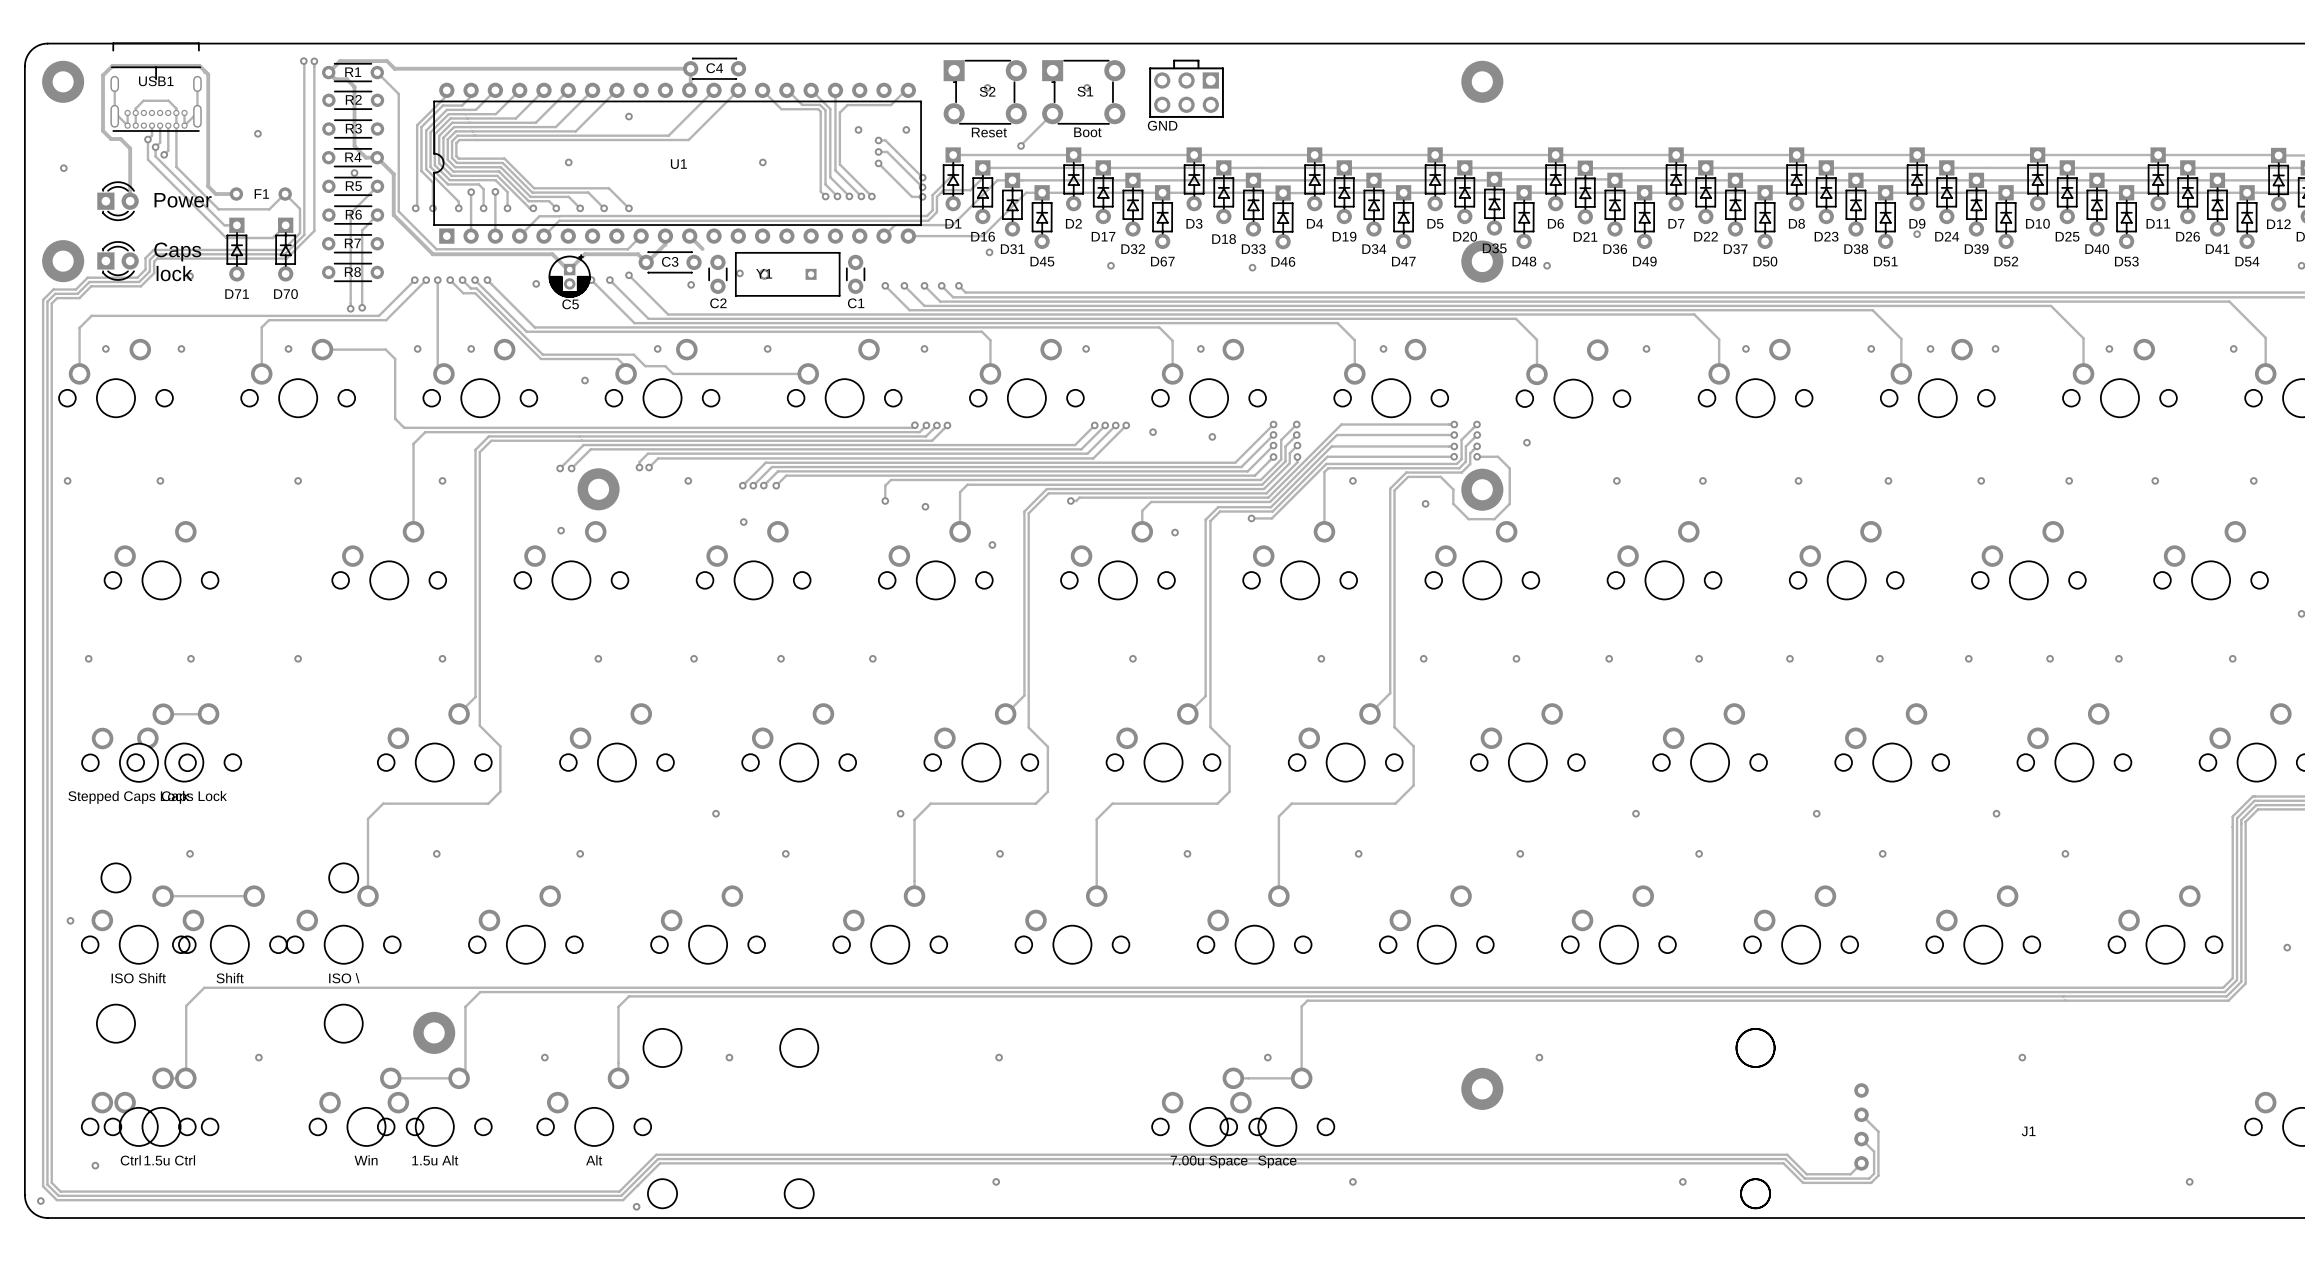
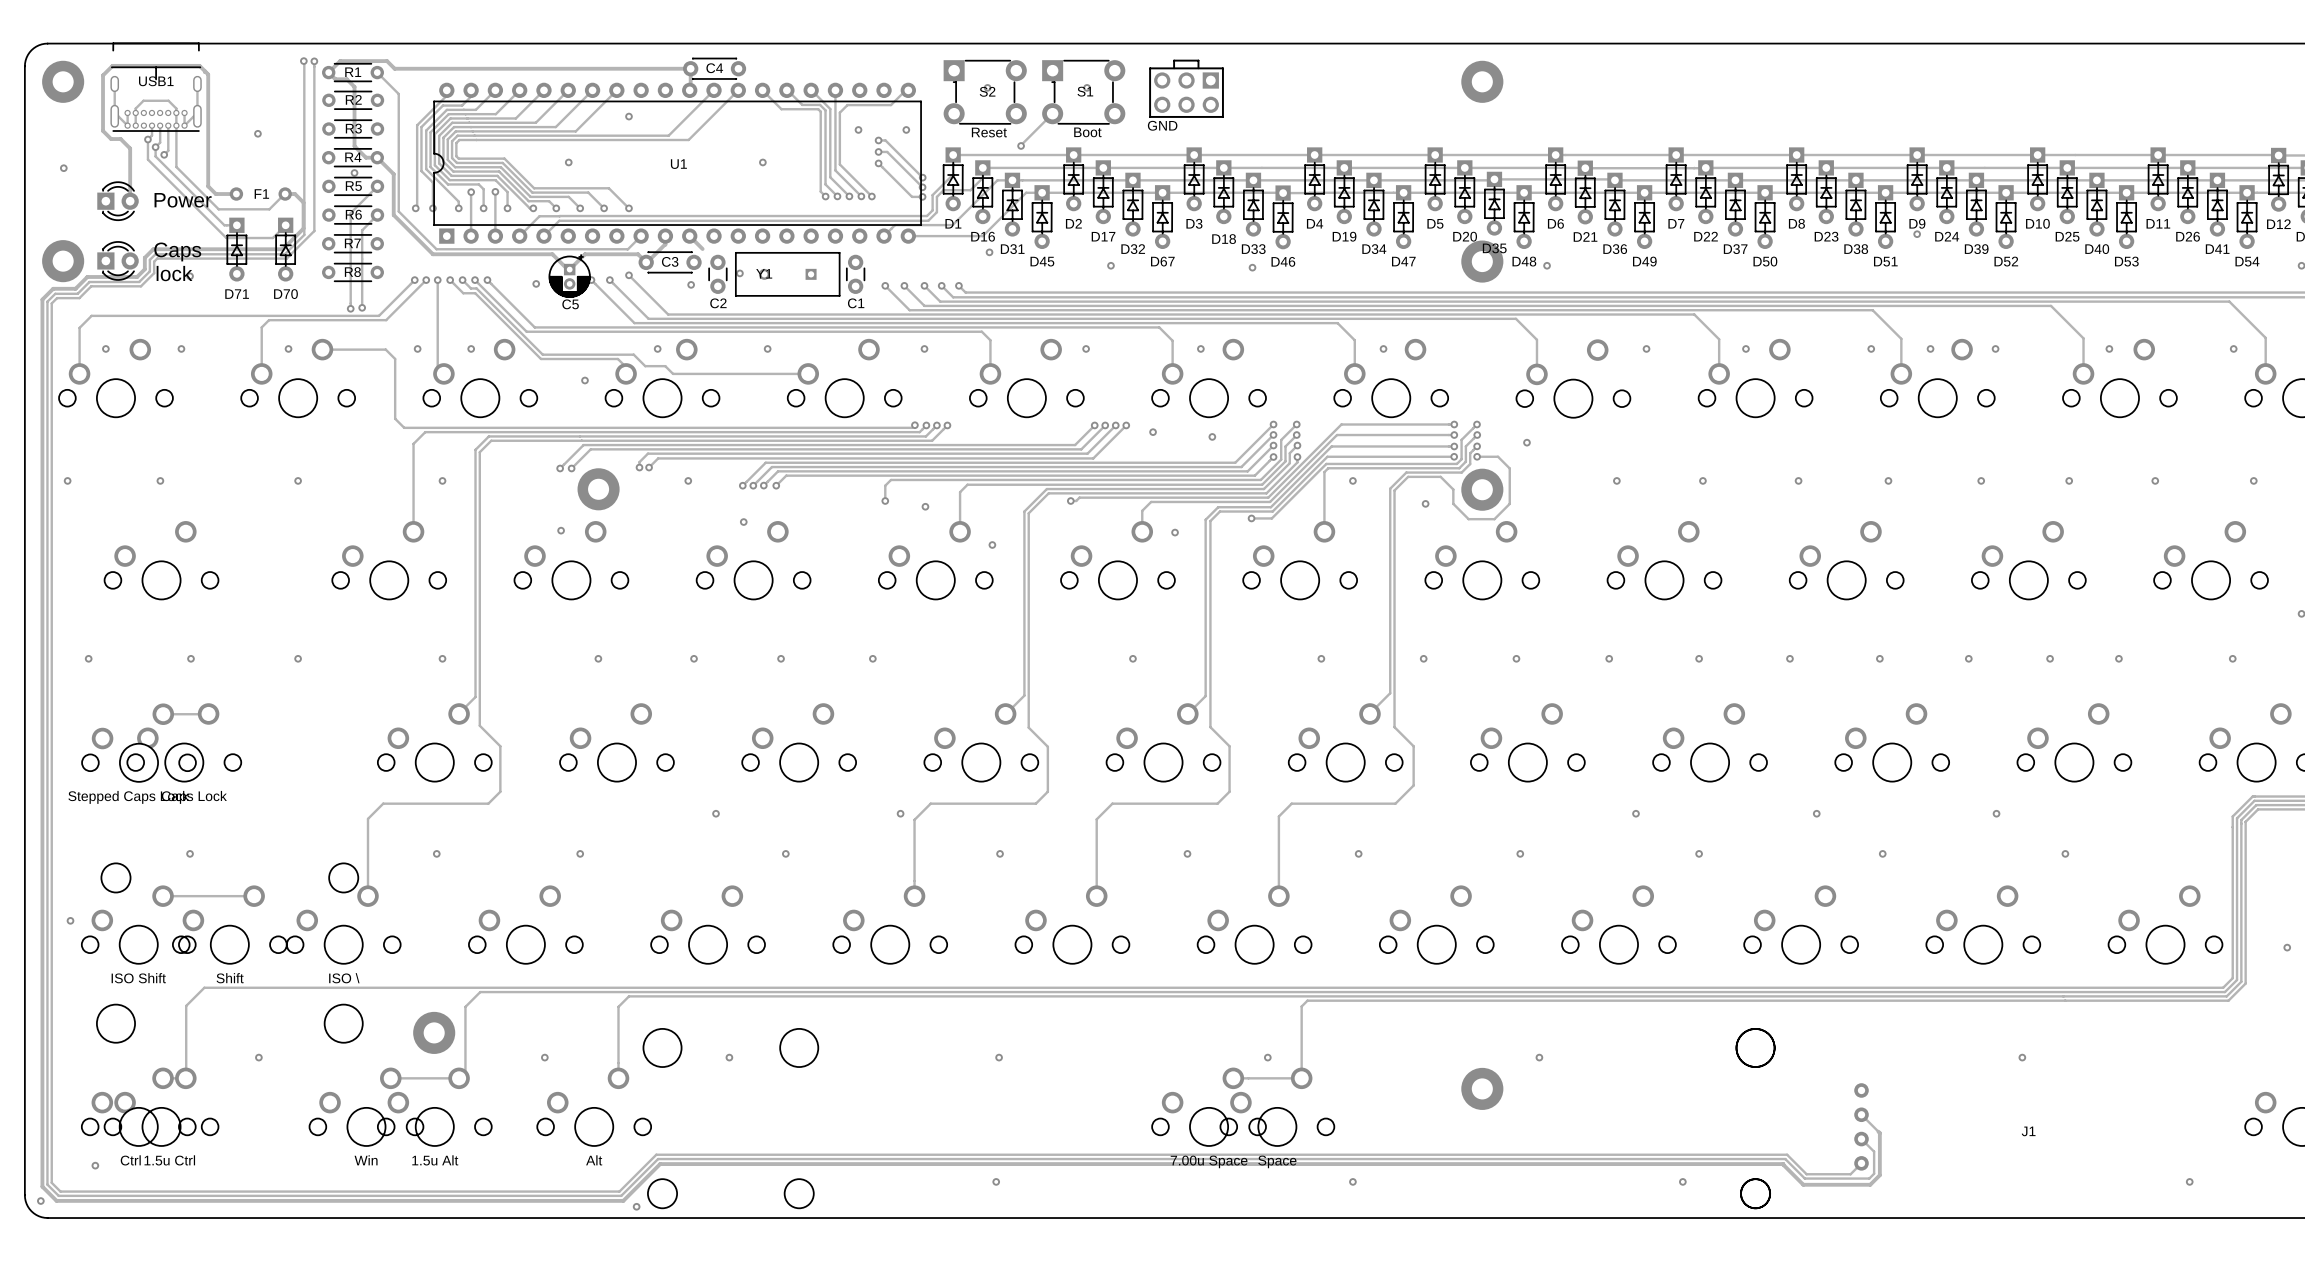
track: (285, 194) (300, 208) (300, 233) (283, 249) (153, 249) (145, 258) (145, 269) (137, 277) (87, 277) (75, 289) (53, 289) (43, 299) (43, 1186) (56, 1200) (623, 1200) (637, 1185) -> none
track: (1878, 1131) (1878, 1175) (1871, 1182) (1803, 1182) (1783, 1163) (659, 1163) (638, 1185) -> (1878, 1131) (1879, 1175) (1870, 1184) (1803, 1184) (1783, 1164) (660, 1164) (623, 1200) (56, 1200) (42, 1186) (42, 299) (53, 288) (75, 288) (87, 276) (137, 276) (144, 269) (144, 257) (153, 249) (282, 249) (303, 228) (303, 202) (294, 194) (284, 194)

